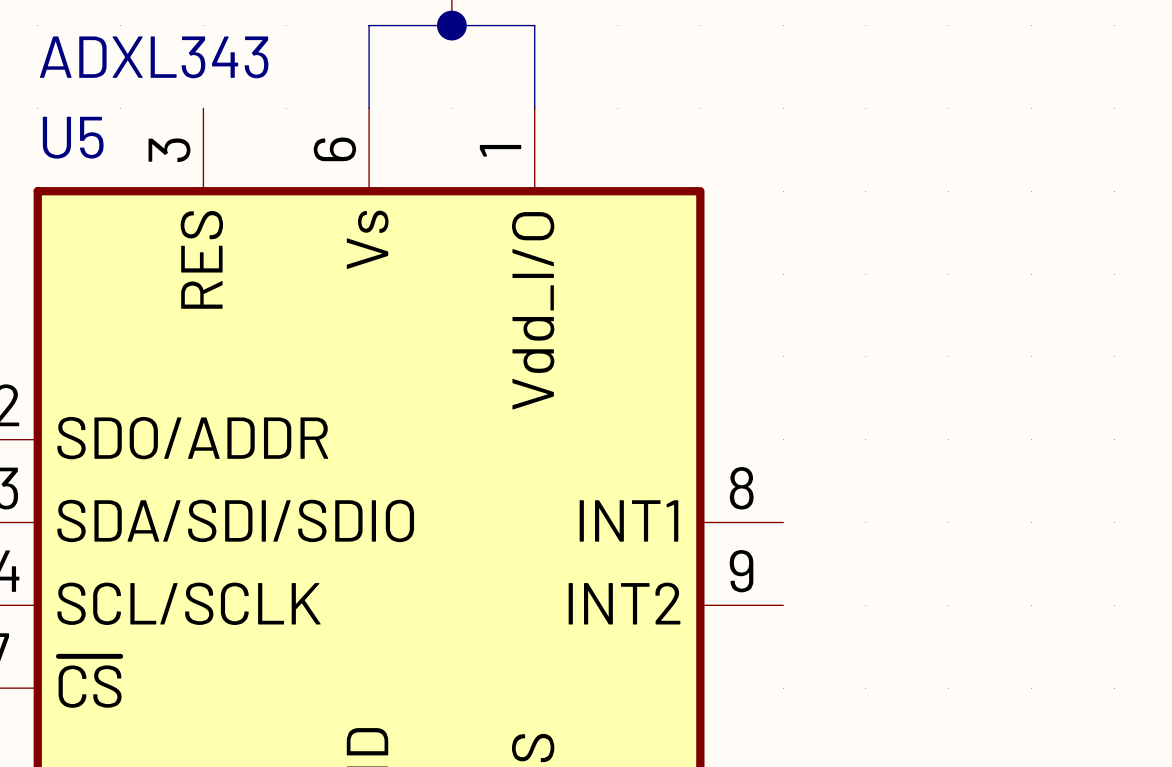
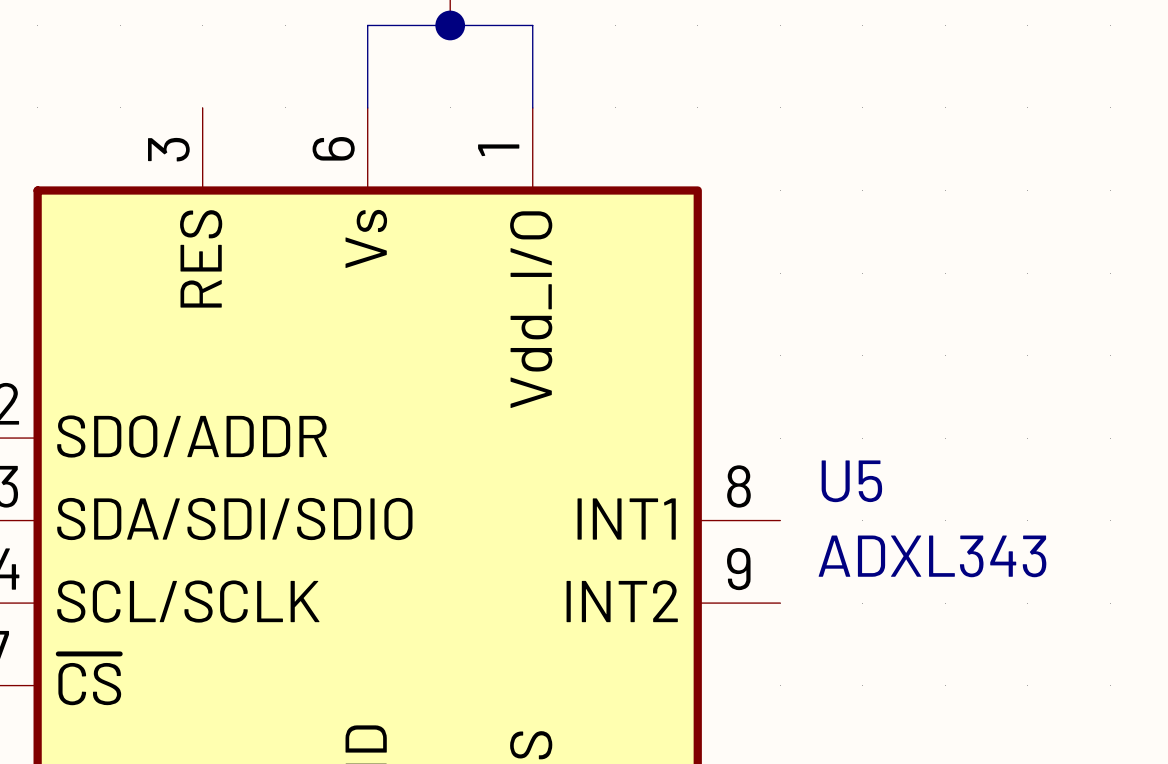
U5 value position: ADXL343 (154, 57) -> ADXL343 (932, 556)
U5 name position: U5 (73, 137) -> U5 (851, 481)

